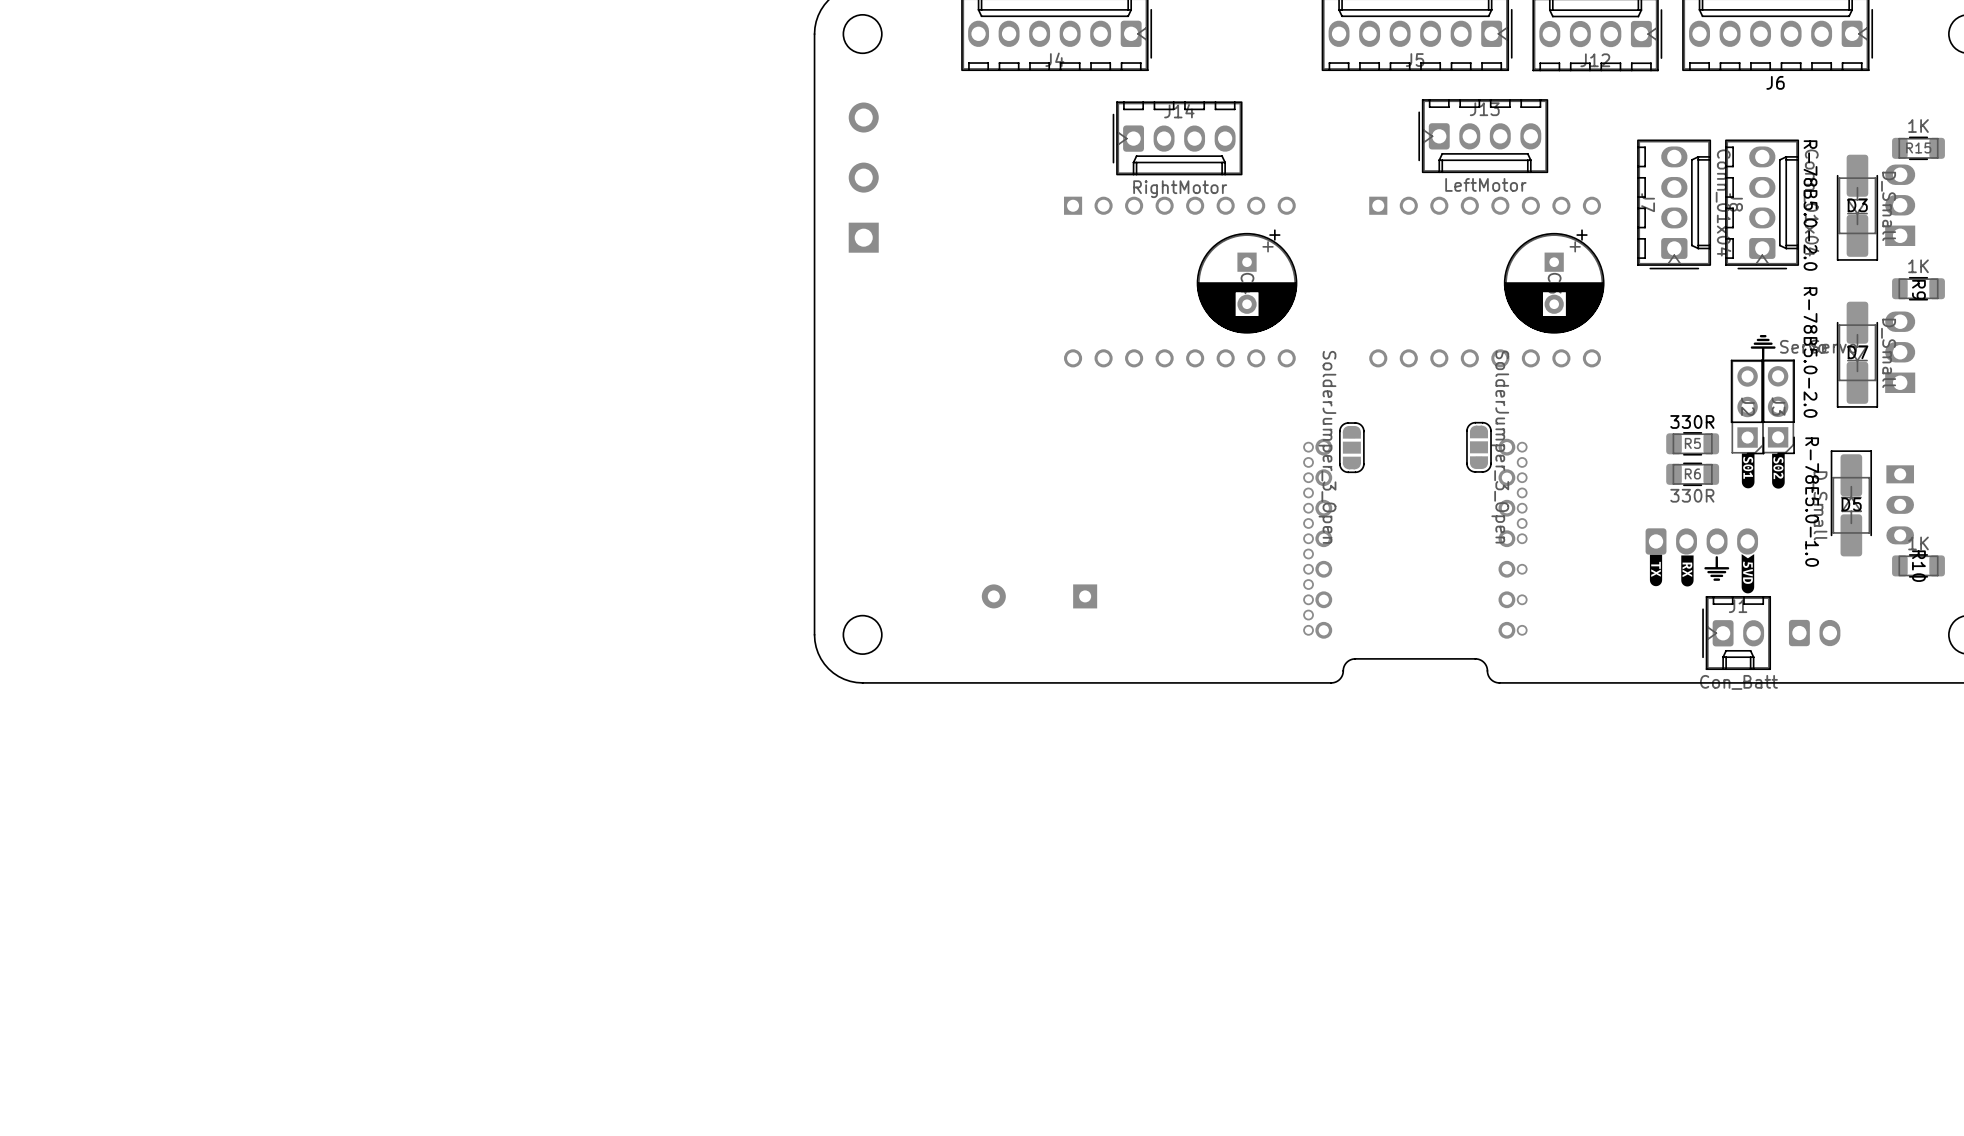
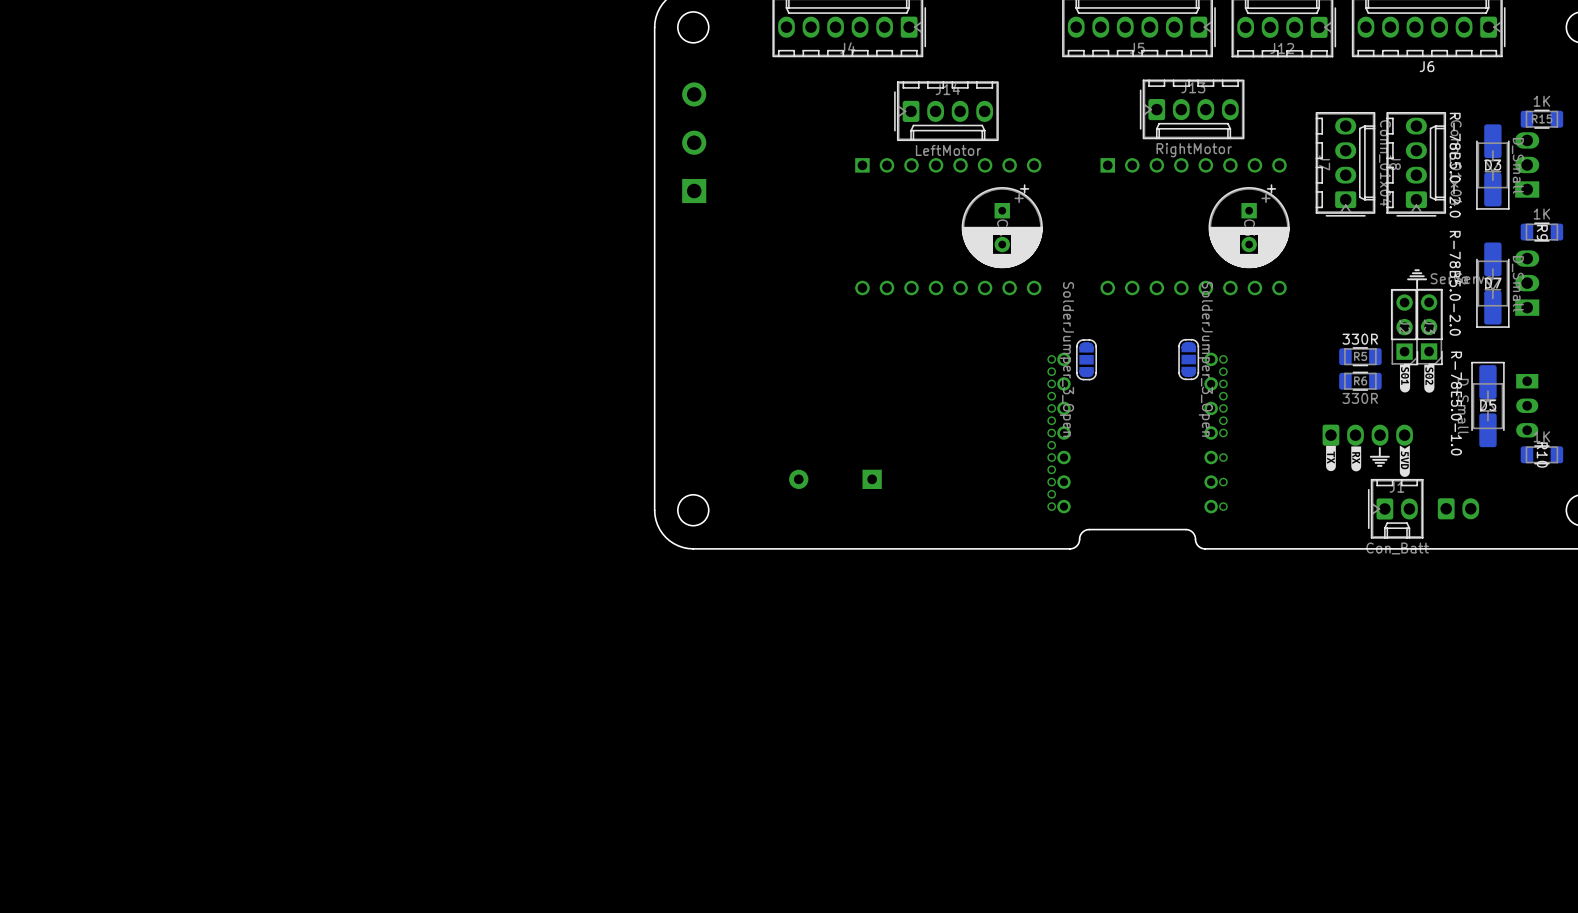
J13 value: LeftMotor (1485, 184) -> RightMotor (1194, 150)
J14 value: RightMotor (1180, 189) -> LeftMotor (948, 150)

